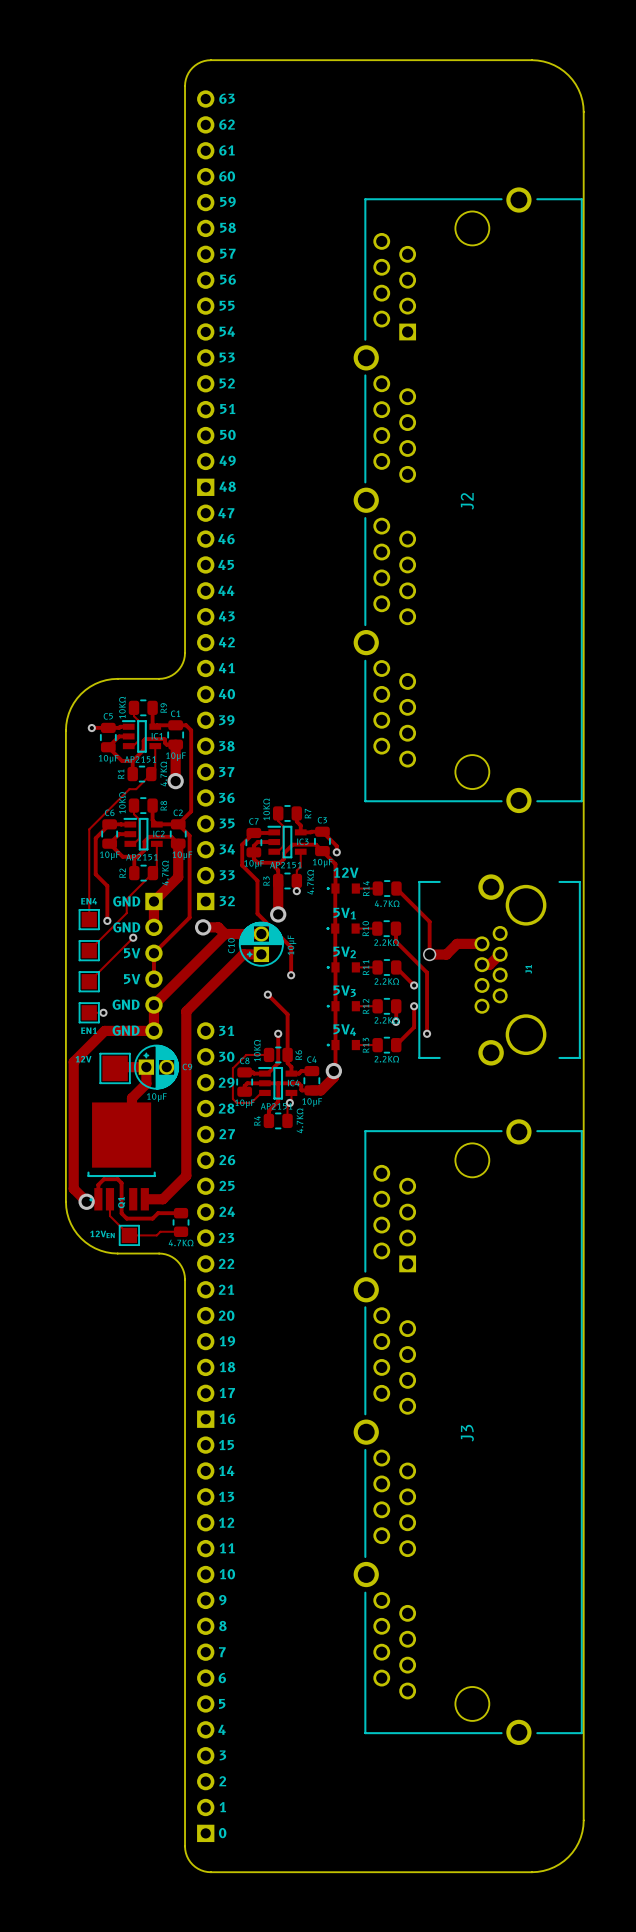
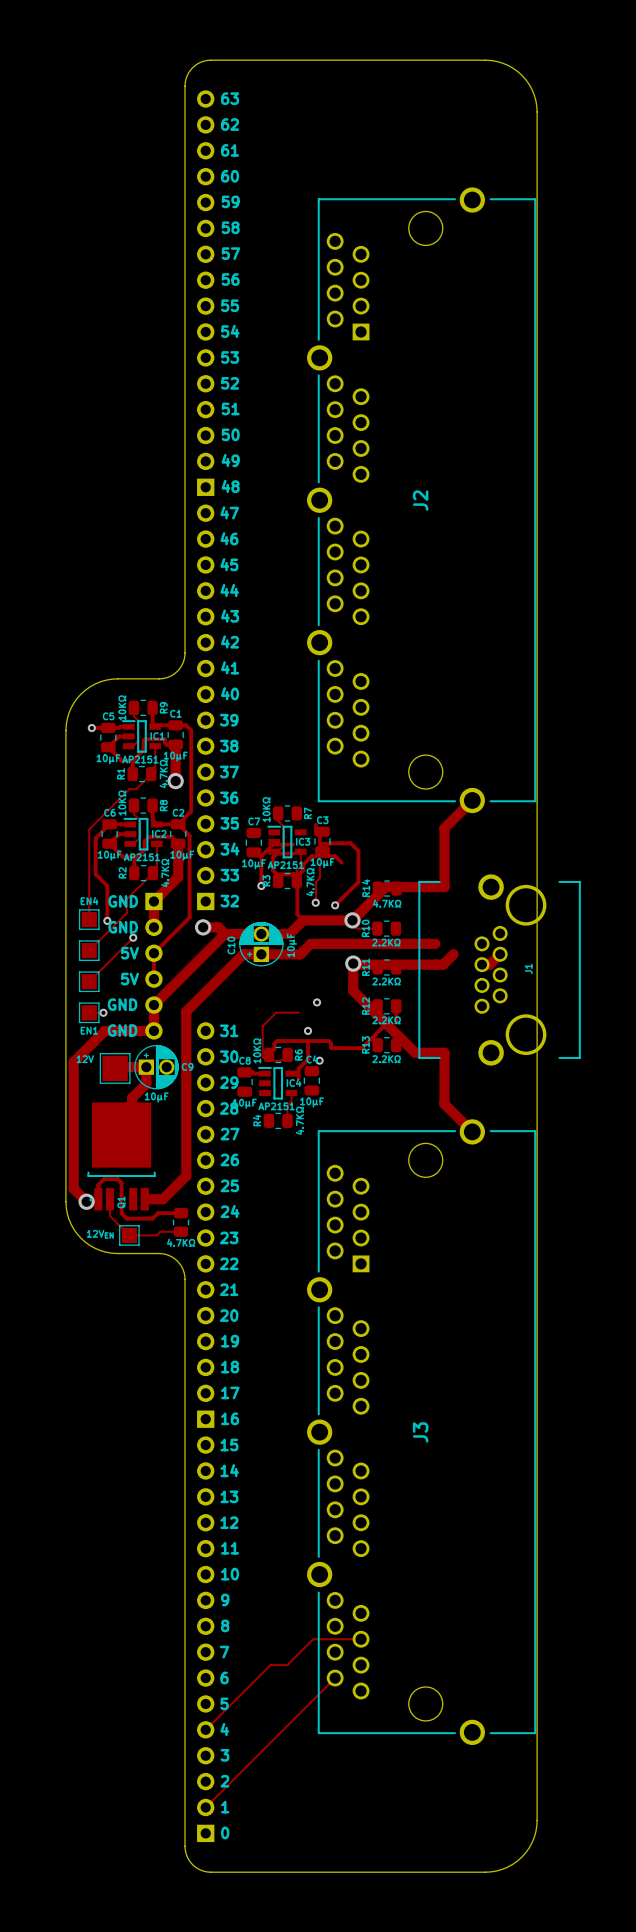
board edge: (485, 60) (537, 60) (554, 65) (568, 75) (575, 84) (582, 100) (583, 111) (583, 1820) (582, 1831) (575, 1847) (568, 1857) (554, 1867) (537, 1871) (485, 1872) -> (485, 60) (507, 65) (521, 75) (531, 89) (537, 111) (537, 1820) (531, 1842) (521, 1857) (507, 1867) (485, 1872)
J2 position: (468, 500) -> (421, 500)
track: none -> (472, 800) (444, 828) (444, 887) (385, 887) (352, 920) (303, 920)
track: (296, 813) (296, 821) (300, 825) (300, 832) (322, 831) (336, 846) (336, 852) -> none
track: none -> (315, 825) (315, 833) (319, 837) (319, 843) (350, 843) (358, 851) (358, 882) (335, 905)
track: (273, 832) (253, 832) (242, 844) (242, 865) (257, 880) (257, 913) (291, 947) (291, 975) -> none
track: (274, 842) (257, 842) (253, 845) (253, 858) (257, 862) (280, 862) (284, 858) (284, 853) (292, 844) (316, 844) (335, 864) (335, 888) -> none
track: none -> (292, 844) (273, 844) (261, 856) (261, 885)
via: (336, 852) -> none
track: none -> (293, 853) (276, 853) (273, 857) (273, 870) (276, 874) (299, 874) (303, 870) (303, 864) (311, 856) (335, 856) (341, 862)
track: (274, 862) (274, 866) (278, 870) (278, 914) -> none
track: none -> (319, 863) (319, 878) (315, 882) (315, 902)
text: 12V (346, 872) -> none
track: none -> (293, 874) (293, 878) (297, 881) (297, 914) (303, 920)
via: none -> (261, 885)
track: (335, 888) (335, 967) -> none
part: (343, 888) -> none
track: (355, 888) (377, 888) -> none
track: (396, 888) (429, 921) (429, 954) (446, 954) (457, 943) (482, 943) -> none
via: (296, 891) -> none
via: none -> (315, 902)
via: none -> (335, 905)
text: 5V1 (344, 913) -> none
via: (278, 914) -> none
track: none -> (303, 920) (289, 934) (261, 934)
via: none -> (352, 920)
part: (343, 928) -> none
track: (395, 928) (395, 941) (427, 972) (427, 1033) -> none
track: none -> (435, 943) (310, 943) (300, 954) (261, 954)
text: 5V2 (344, 952) -> none
via: (429, 954) -> none
track: none -> (453, 954) (443, 964) (353, 963) (353, 990) (415, 1052) (444, 1052) (444, 1104) (472, 1131)
via: none -> (353, 963)
track: (335, 967) (335, 1069) (333, 1077) (320, 1090) (301, 1090) (298, 1083) (247, 1083) (244, 1086) (244, 1091) -> none
part: (343, 967) -> none
track: (396, 967) (414, 985) -> none
via: (291, 975) -> none
via: (414, 985) -> none
text: 5V3 (344, 991) -> none
track: (267, 994) (287, 1014) (287, 1063) (291, 1067) (291, 1073) (311, 1071) -> none
via: (267, 994) -> none
via: none -> (317, 1002)
part: (343, 1006) -> none
track: (355, 1006) (377, 1006) -> none
track: (414, 1006) (414, 1027) (396, 1045) -> none
via: (414, 1006) -> none
via: (395, 1021) -> none
track: none -> (386, 1023) (361, 1048) (331, 1048) (328, 1041) (277, 1041) (274, 1043) (274, 1049)
via: none -> (308, 1030)
text: 5V4 (344, 1030) -> none
track: (278, 1033) (278, 1063) (267, 1073) -> none
via: (278, 1033) -> none
via: (427, 1033) -> none
part: (343, 1045) -> none
track: (355, 1045) (377, 1045) -> none
track: (269, 1054) (246, 1054) (232, 1068) (232, 1099) (236, 1102) (251, 1102) (261, 1092) -> (298, 1012) (276, 1012) (262, 1026) (262, 1056) (266, 1060) (281, 1060) (290, 1050)
via: none -> (319, 1060)
via: (333, 1071) -> none
track: (278, 1083) (278, 1101) (268, 1110) (268, 1120) -> (307, 1041) (307, 1059) (298, 1068) (298, 1078)
via: (289, 1102) -> none
J3 position: (468, 1432) -> (421, 1432)
track: none -> (361, 1639) (313, 1639) (287, 1665) (270, 1665) (205, 1729)
track: none -> (335, 1678) (205, 1807)

